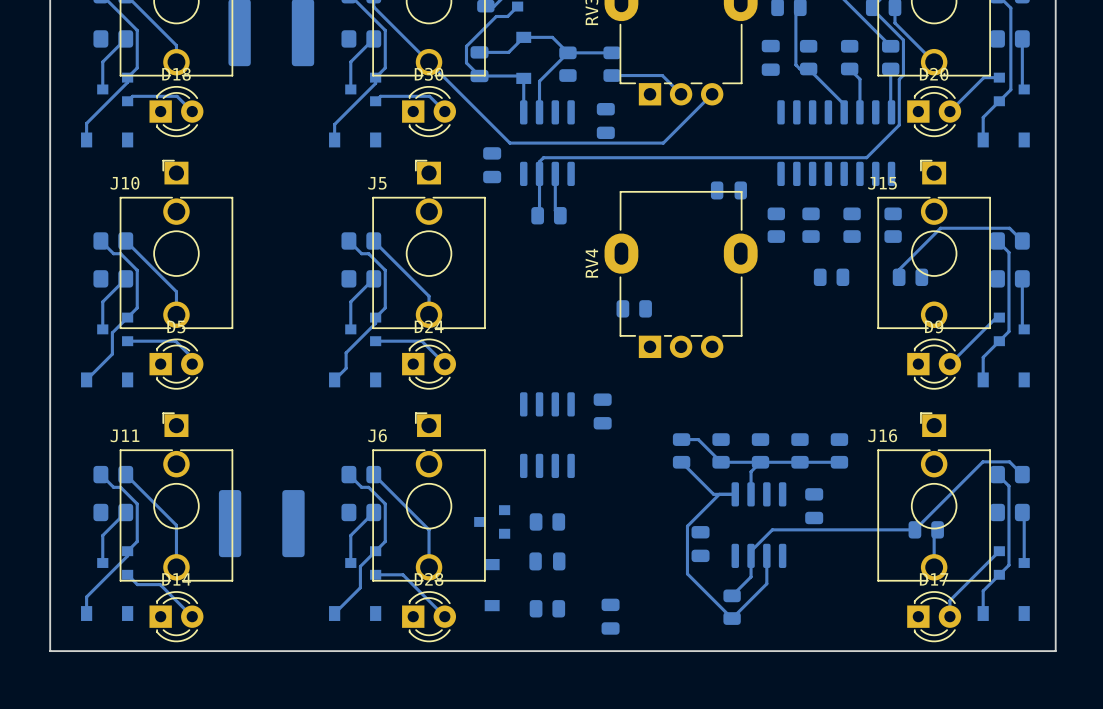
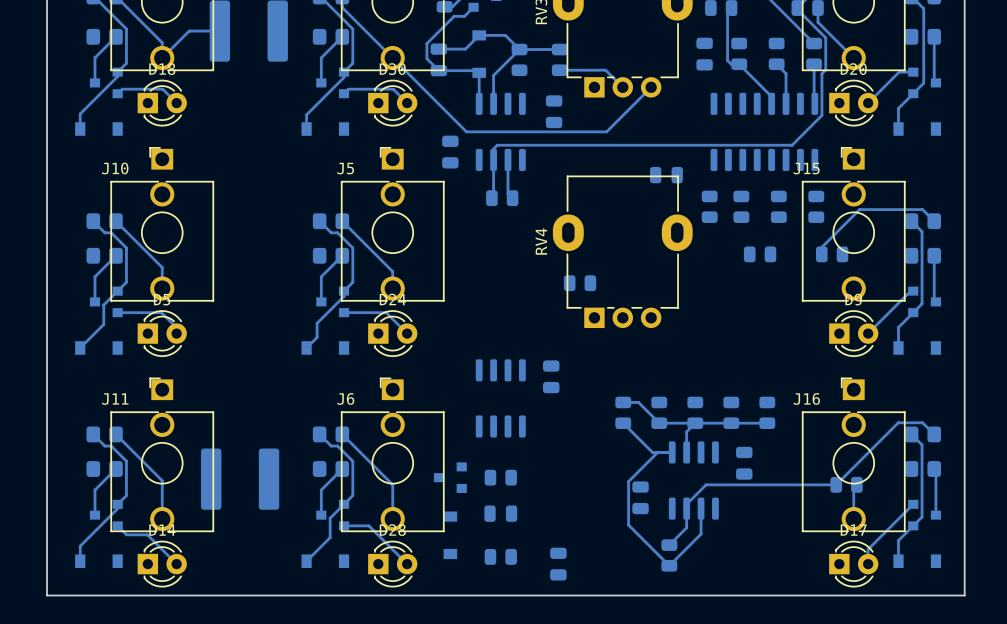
bottom track: none -> (219, 31) (189, 31) (162, 58)

